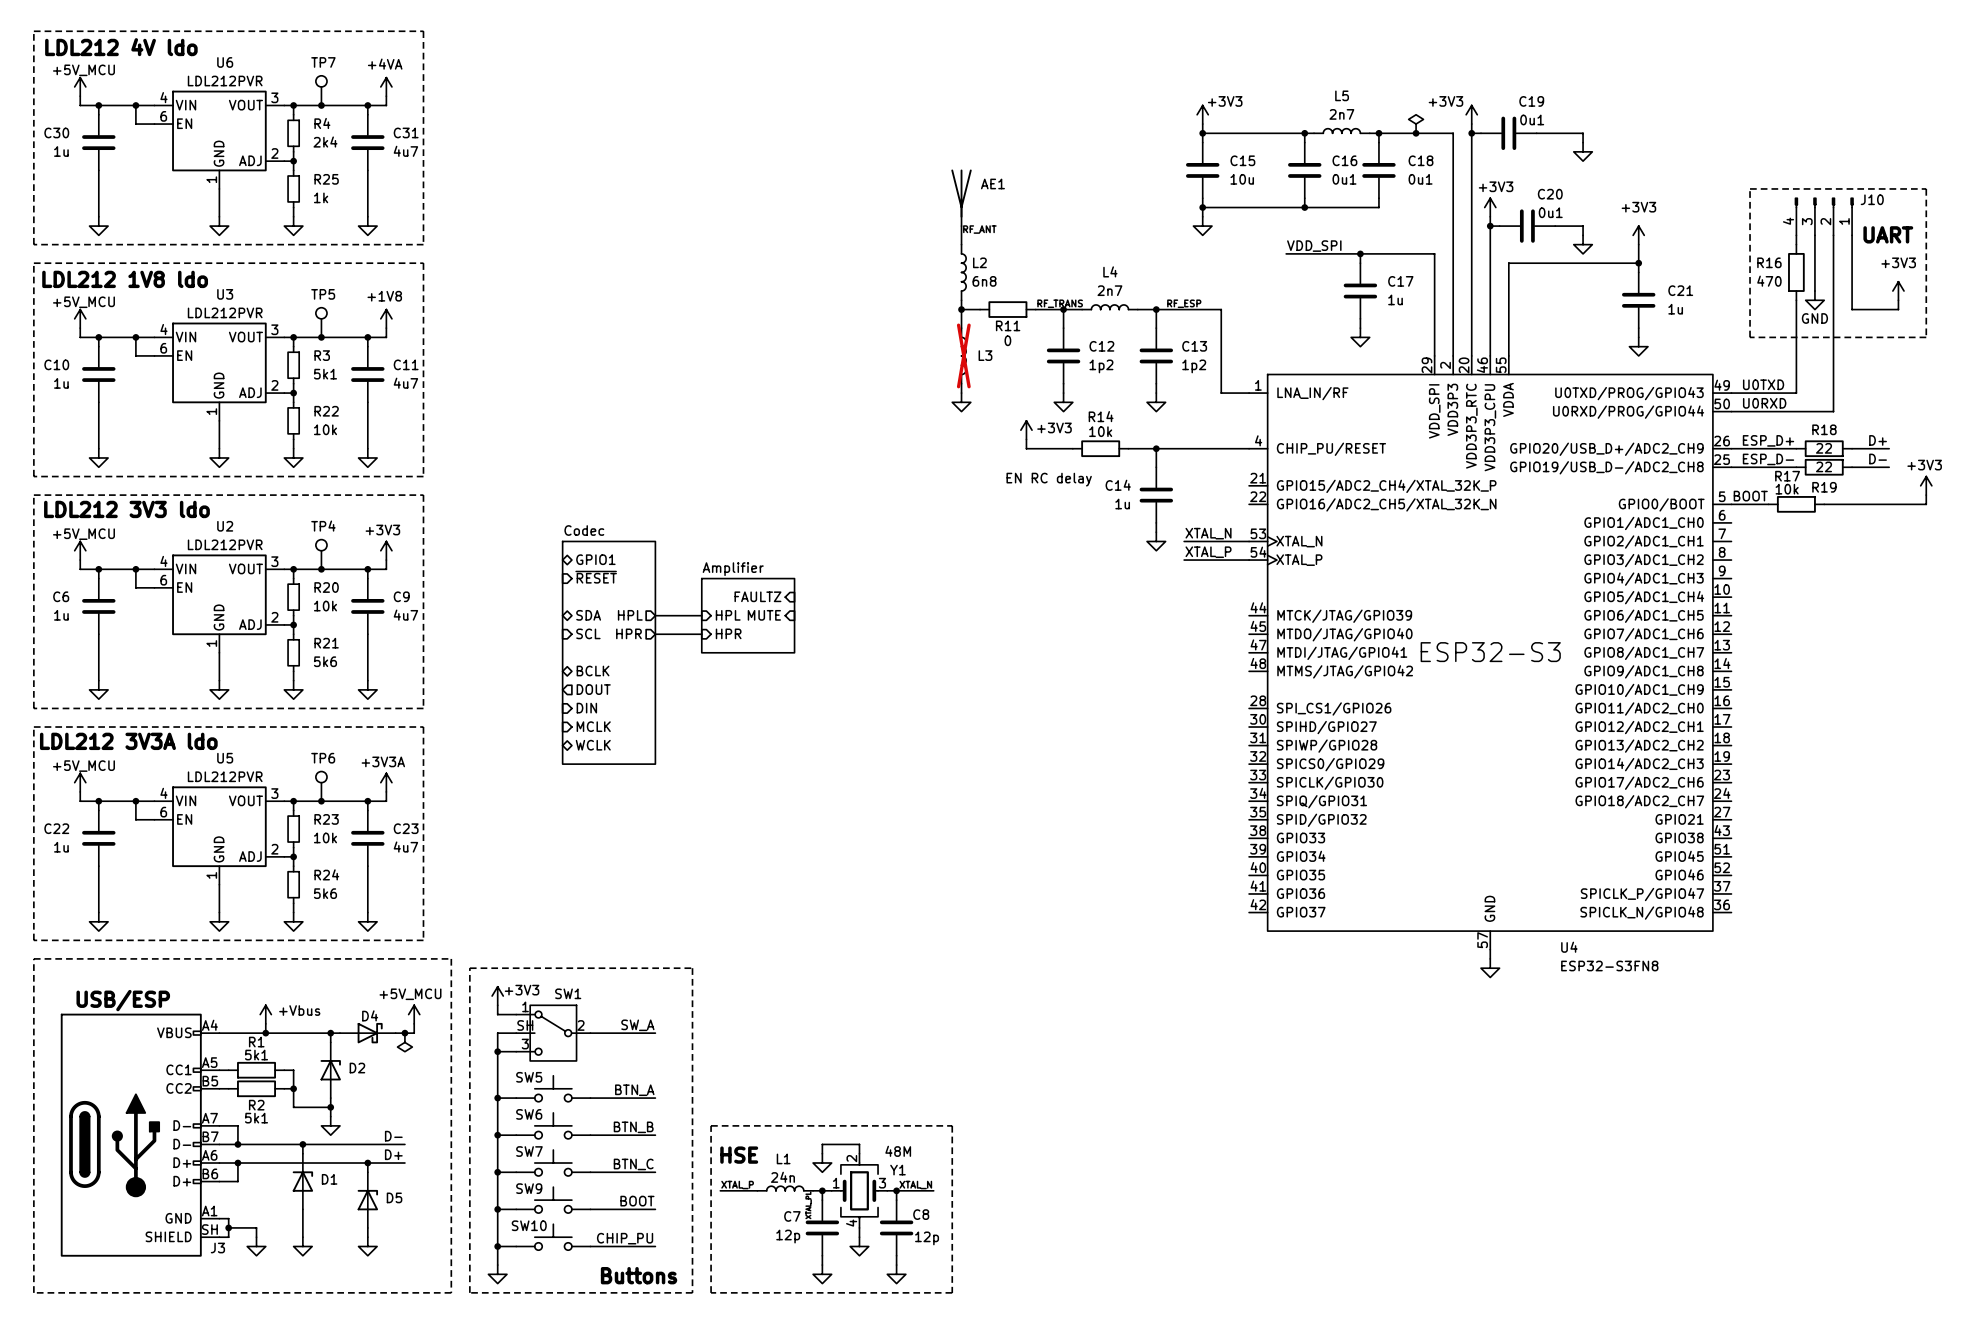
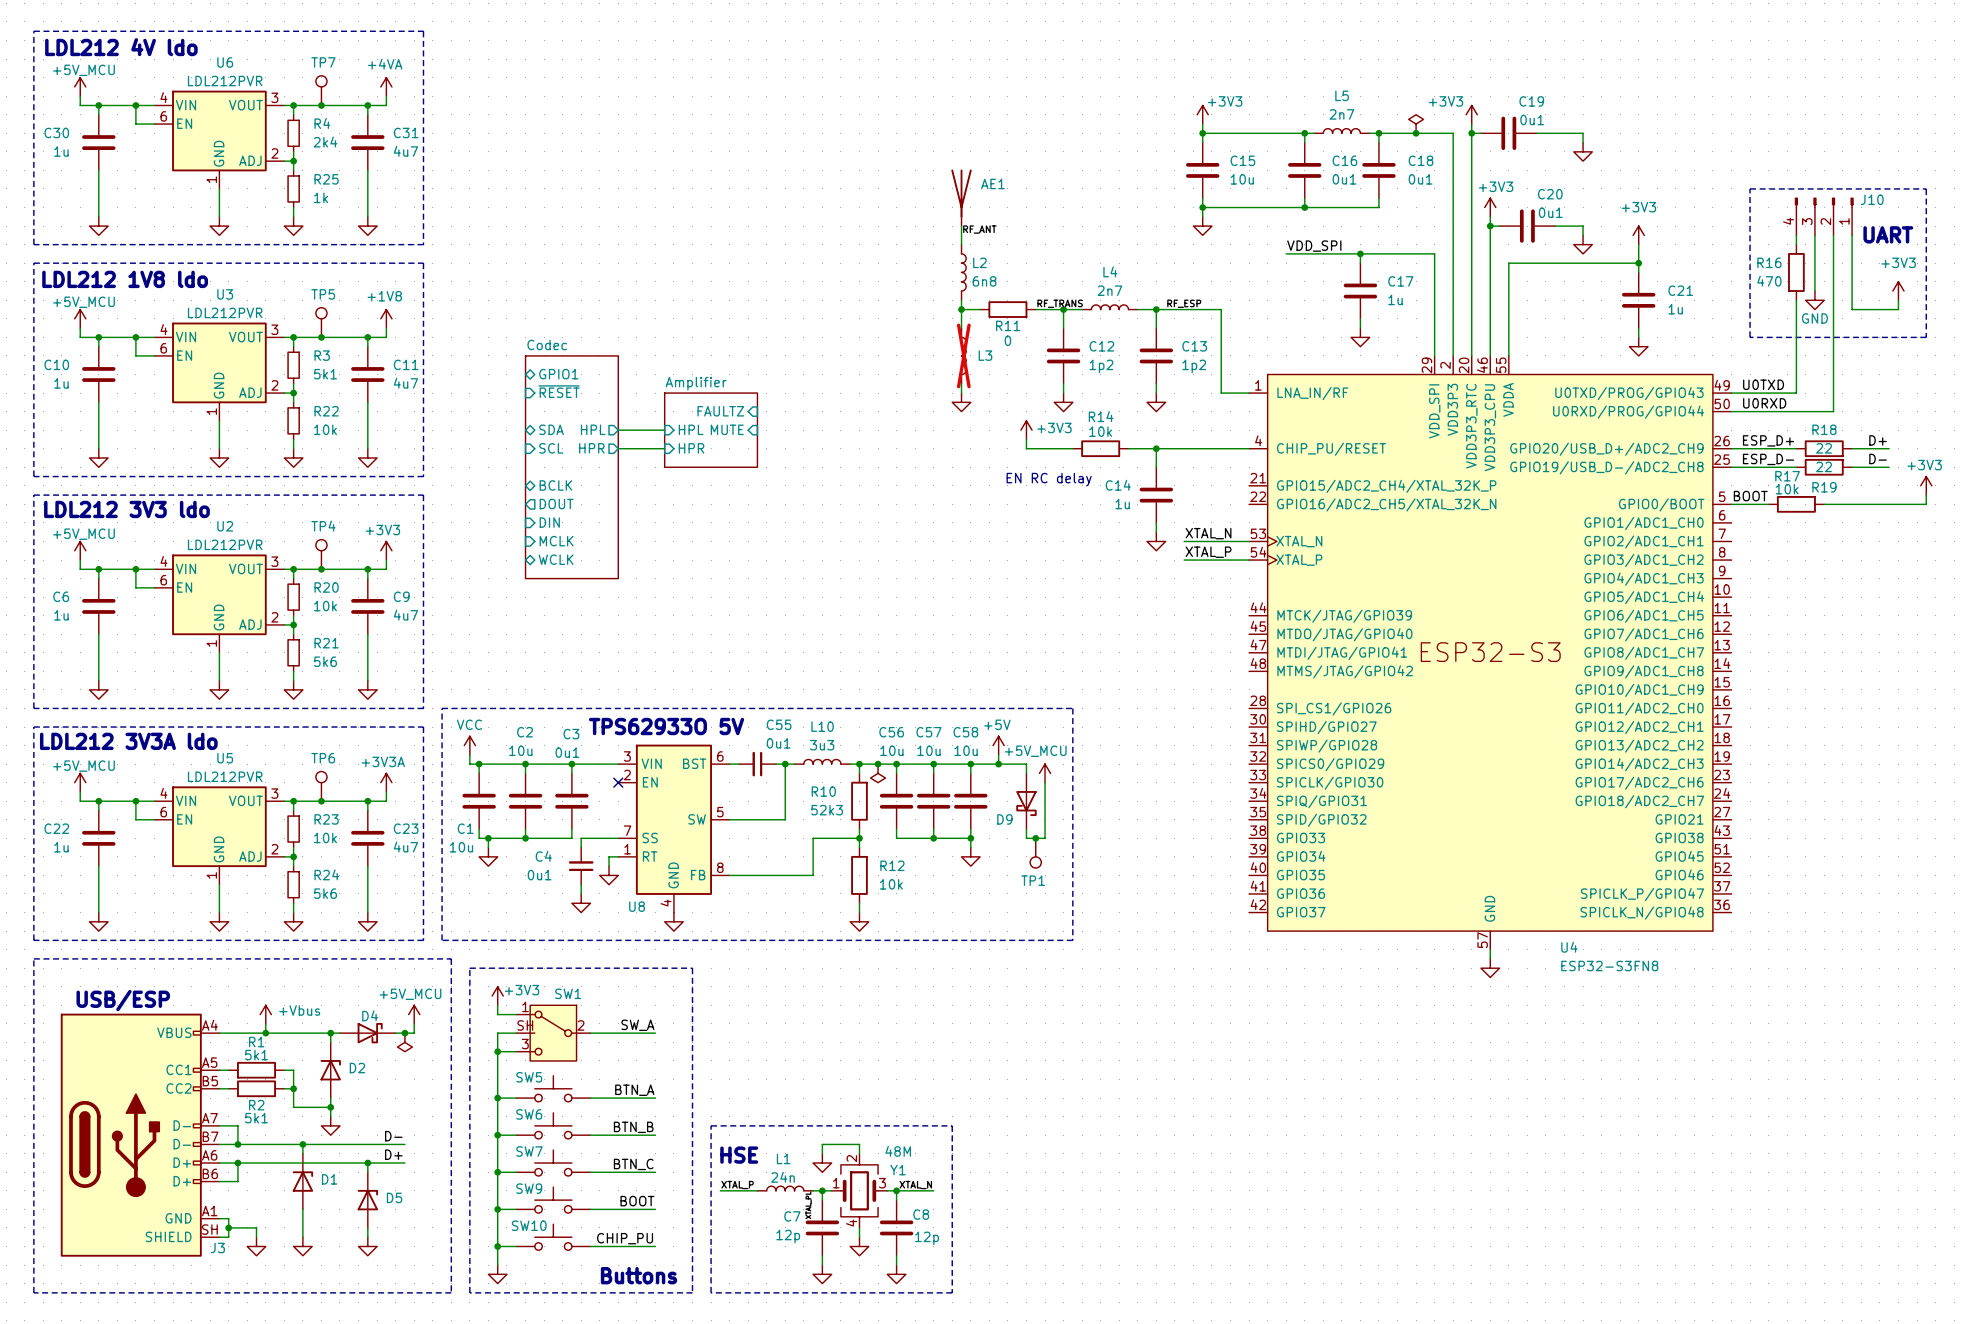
sheet pin: none -> GPIO1 (558, 374)
sheet pin: none -> ~{RESET} (559, 391)
sheet pin: none -> FAULTZ (720, 411)
sheet pin: none -> SDA (551, 429)
sheet pin: none -> HPL (593, 429)
sheet pin: none -> HPL (691, 429)
sheet pin: none -> MUTE (727, 429)
wire: none -> (618, 430) (664, 430)
sheet Amplifier: none -> (711, 430)
sheet pin: none -> SCL (551, 448)
sheet pin: none -> HPR (591, 448)
sheet pin: none -> HPR (691, 448)
sheet Codec: none -> (571, 467)
sheet pin: none -> BCLK (555, 485)
sheet pin: none -> DOUT (556, 504)
sheet pin: none -> DIN (549, 522)
sheet pin: none -> MCLK (556, 541)
sheet pin: none -> WCLK (556, 559)
sheet pin: GPIO1 (595, 559) -> none
sheet pin: ~{RESET} (596, 577) -> none
sheet pin: FAULTZ (757, 596) -> none
sheet pin: SDA (588, 615) -> none
sheet pin: HPL (630, 615) -> none
wire: (655, 615) (701, 615) -> (618, 448) (664, 448)
sheet pin: HPL (728, 615) -> none
sheet Amplifier: (748, 615) -> none
sheet pin: MUTE (764, 615) -> none
sheet pin: SCL (588, 633) -> none
sheet pin: HPR (628, 633) -> none
sheet pin: HPR (728, 633) -> none
wire: (655, 634) (701, 634) -> none
sheet Codec: (609, 652) -> none
sheet pin: BCLK (593, 671) -> none
sheet pin: DOUT (593, 689) -> none
line: none -> (442, 708) (1072, 708) (1072, 940) (442, 940) (442, 708)
sheet pin: DIN (586, 708) -> none
sheet pin: MCLK (593, 726) -> none
text: none -> TPS62933O 5V (666, 726)
power symbol: none -> VCC (469, 745)
sheet pin: WCLK (593, 745) -> none
power symbol: none -> +5V (998, 745)
wire: none -> (469, 754) (469, 764) (618, 764)
wire: none -> (998, 754) (998, 764)
L10: none -> 3u3 (822, 761)
wire: none -> (479, 764) (479, 773)
junction: none -> (479, 764)
wire: none -> (525, 764) (525, 773)
junction: none -> (525, 764)
wire: none -> (571, 764) (571, 773)
junction: none -> (571, 764)
wire: none -> (729, 764) (738, 764)
C55: none -> 0u1 (757, 764)
wire: none -> (775, 764) (794, 764)
wire: none -> (785, 764) (785, 819) (729, 819)
junction: none -> (785, 764)
wire: none -> (850, 764) (1026, 764) (1026, 773)
wire: none -> (859, 764) (859, 773)
junction: none -> (859, 764)
junction: none -> (878, 764)
wire: none -> (896, 764) (896, 773)
junction: none -> (896, 764)
wire: none -> (933, 764) (933, 773)
junction: none -> (933, 764)
wire: none -> (970, 764) (970, 773)
junction: none -> (970, 764)
junction: none -> (998, 764)
power symbol: none -> (878, 773)
power symbol: none -> +5V_MCU (1045, 773)
no-connect mark: none -> (618, 782)
wire: none -> (1045, 782) (1045, 838) (1026, 838) (1026, 829)
C1: none -> 10u (479, 801)
C2: none -> 10u (525, 801)
C3: none -> 0u1 (571, 801)
R10: none -> 52k3 (859, 801)
C56: none -> 10u (896, 801)
C57: none -> 10u (933, 801)
C58: none -> 10u (970, 801)
D9: none -> (1026, 801)
U8: none -> (673, 828)
wire: none -> (479, 829) (479, 838) (571, 838) (571, 829)
wire: none -> (525, 829) (525, 838)
wire: none -> (859, 829) (859, 847)
wire: none -> (896, 829) (896, 838) (970, 838)
wire: none -> (933, 829) (933, 838)
wire: none -> (970, 829) (970, 847)
wire: none -> (488, 838) (488, 847)
junction: none -> (488, 838)
junction: none -> (525, 838)
wire: none -> (618, 838) (581, 838) (581, 847)
wire: none -> (859, 838) (813, 838) (813, 875) (729, 875)
junction: none -> (859, 838)
junction: none -> (933, 838)
junction: none -> (970, 838)
junction: none -> (1035, 838)
TP1: none -> (1035, 853)
power symbol: none -> (488, 856)
wire: none -> (618, 856) (609, 856) (609, 866)
power symbol: none -> (970, 856)
C4: none -> 0u1 (581, 866)
power symbol: none -> (609, 875)
R12: none -> 10k (859, 875)
wire: none -> (581, 884) (581, 893)
power symbol: none -> (581, 903)
wire: none -> (859, 903) (859, 912)
power symbol: none -> (673, 921)
power symbol: none -> (859, 921)

